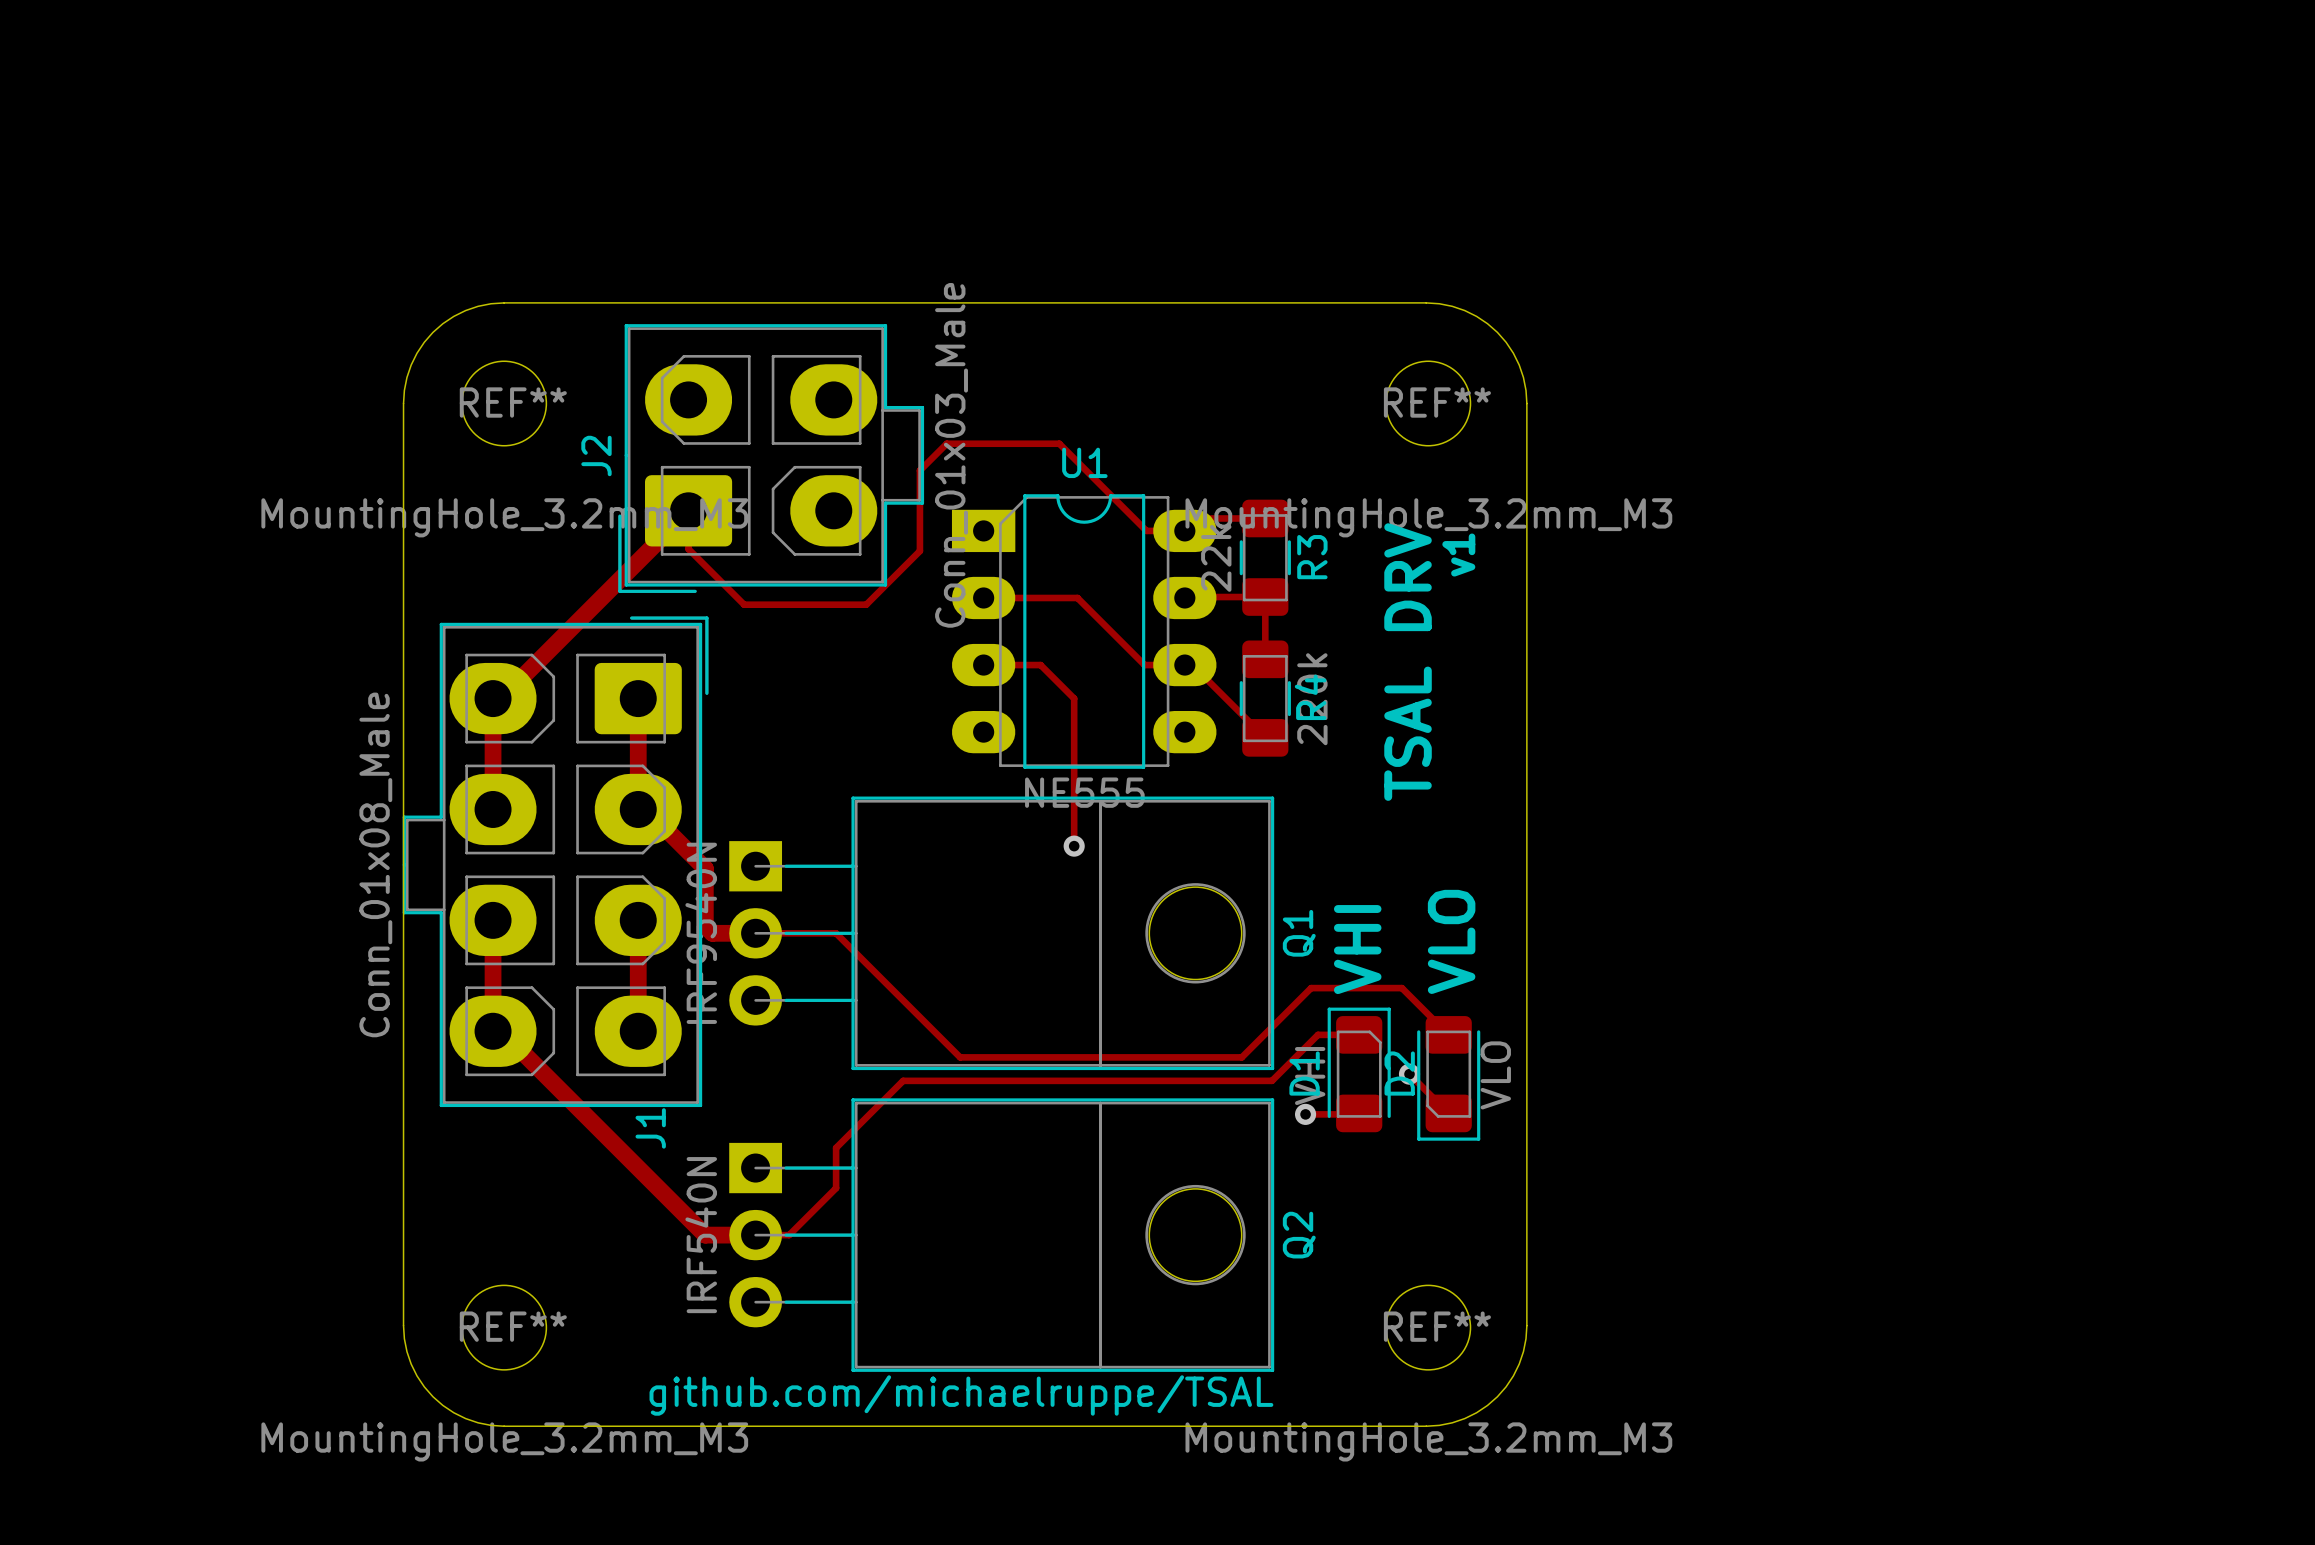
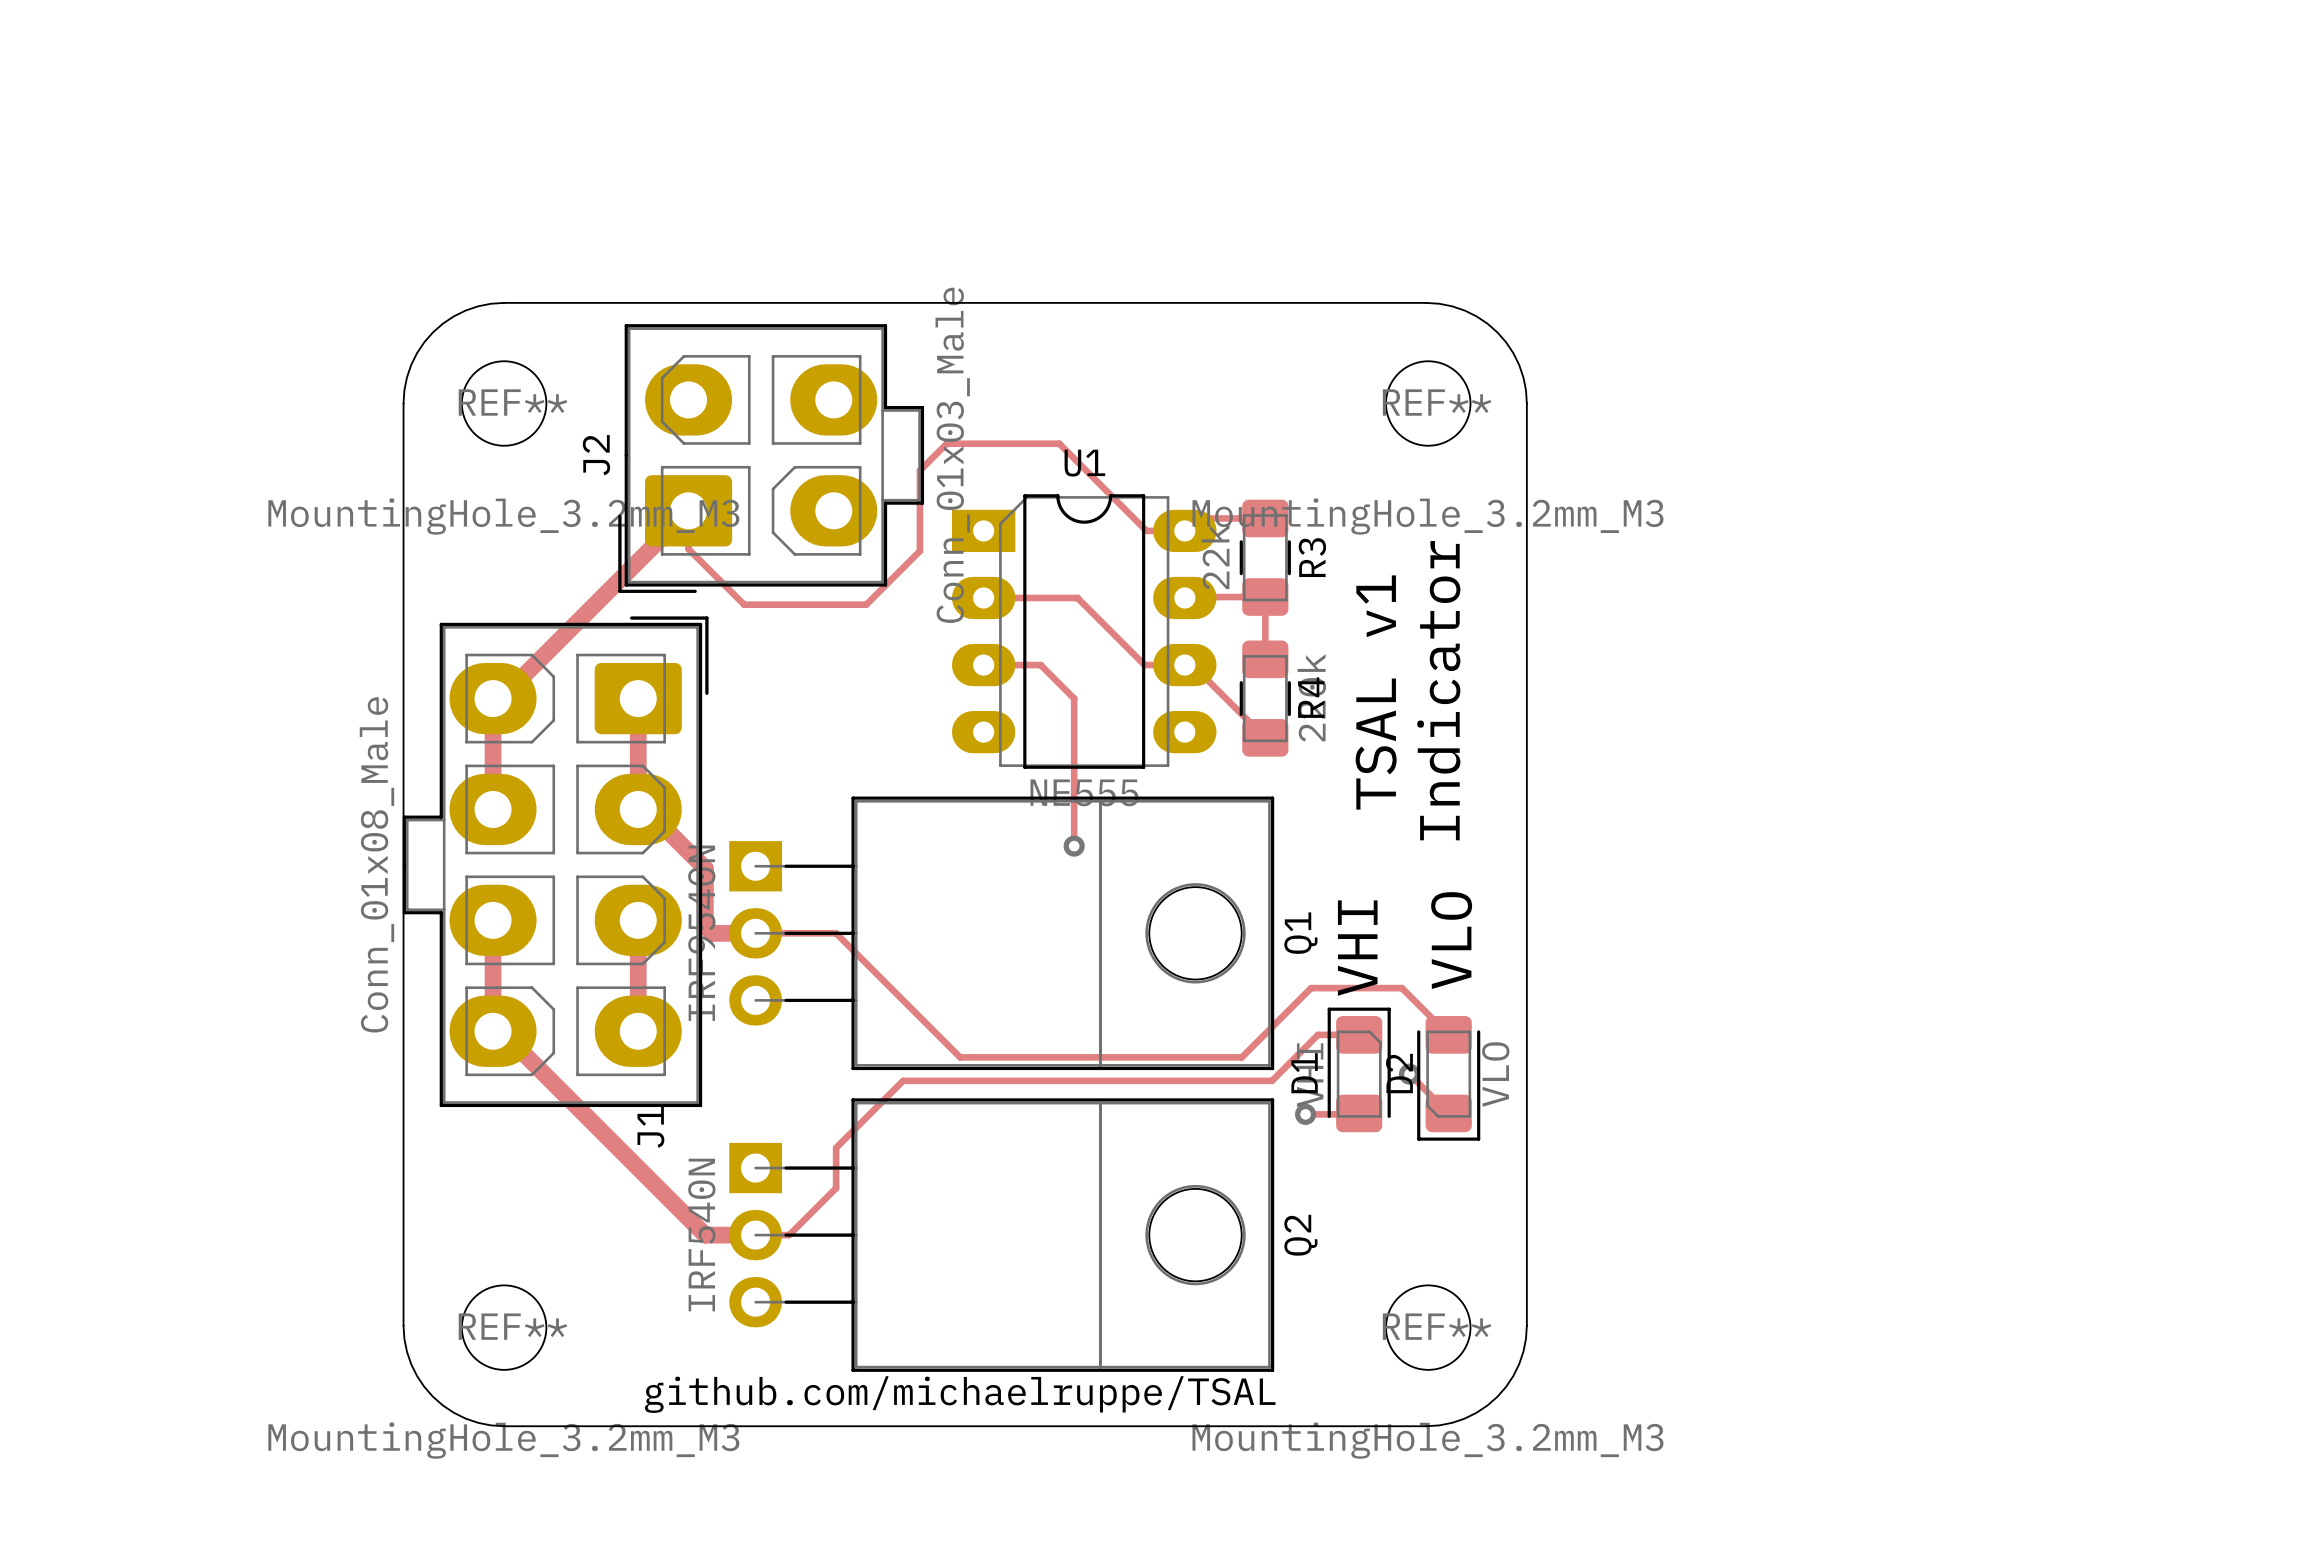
text: v1 (1458, 555) -> none
text: TSAL DRV (1408, 662) -> TSAL v1 (1376, 692)
text: none -> Indicator (1438, 690)

